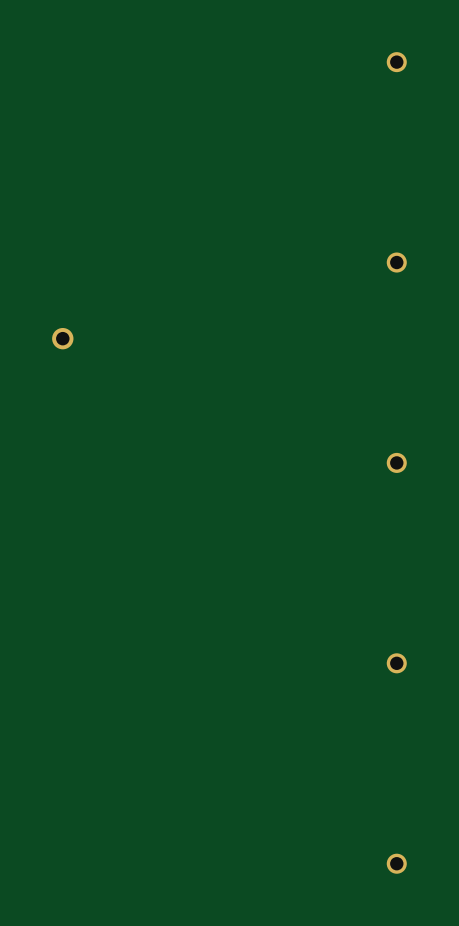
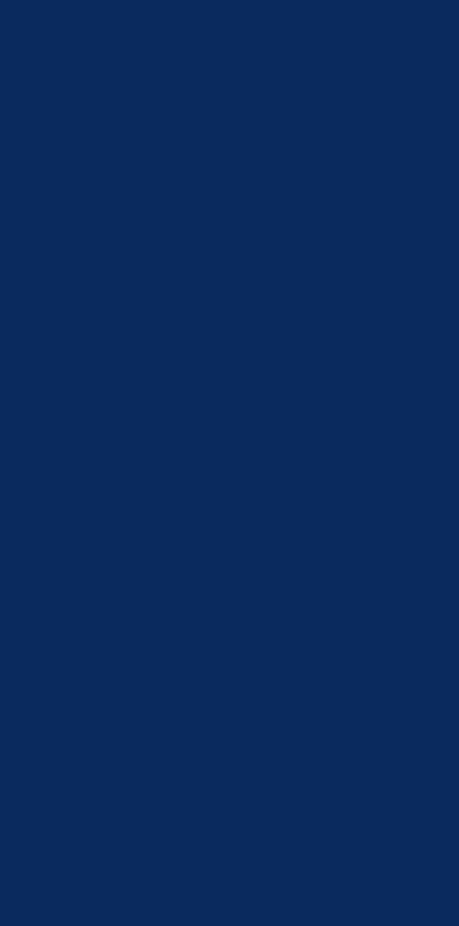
part: (396, 62) -> none
part: (396, 262) -> none
part: (62, 338) -> none
part: (396, 462) -> none
part: (396, 663) -> none
part: (396, 863) -> none

